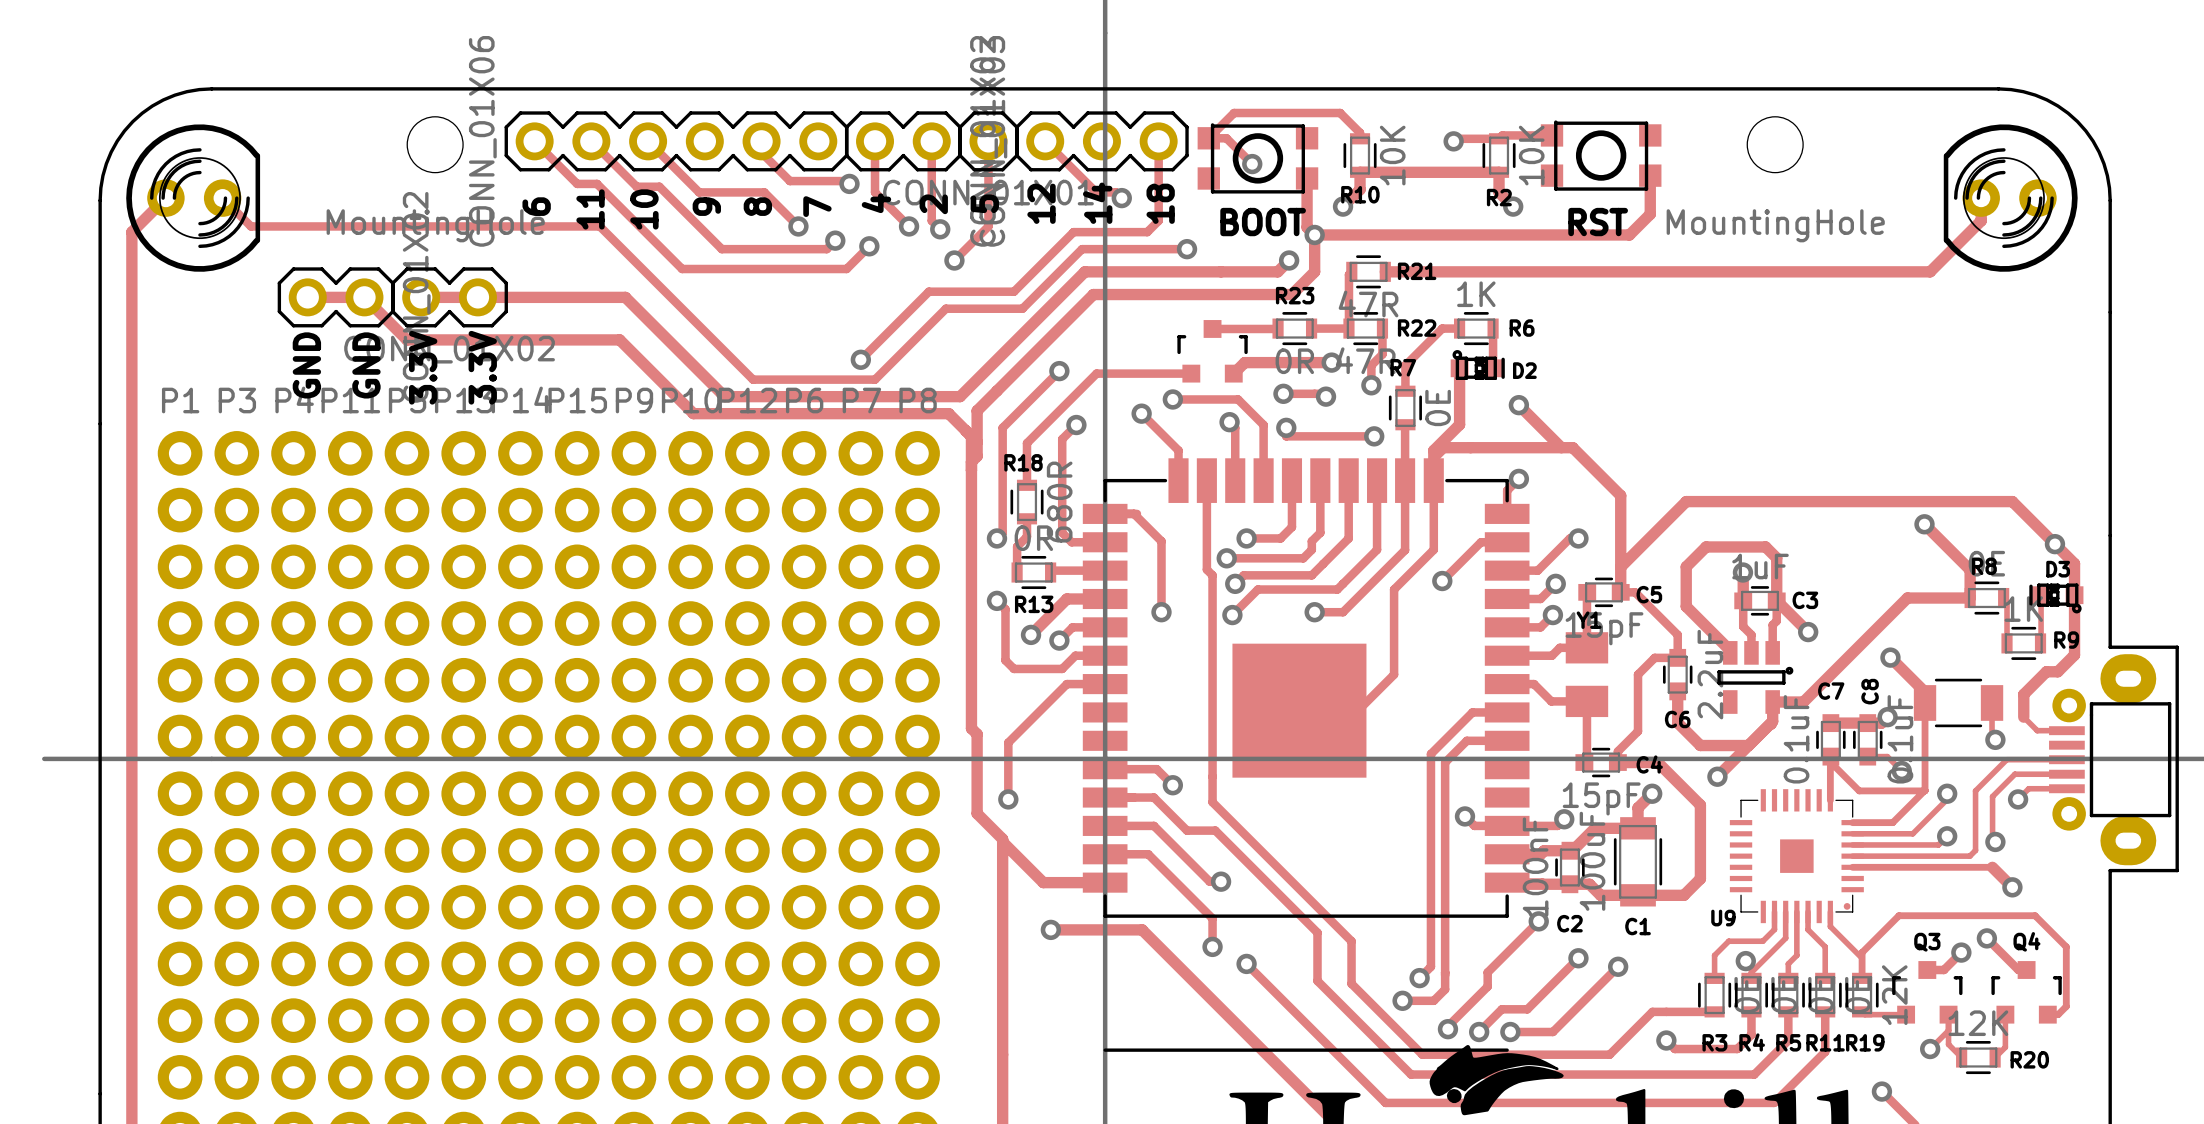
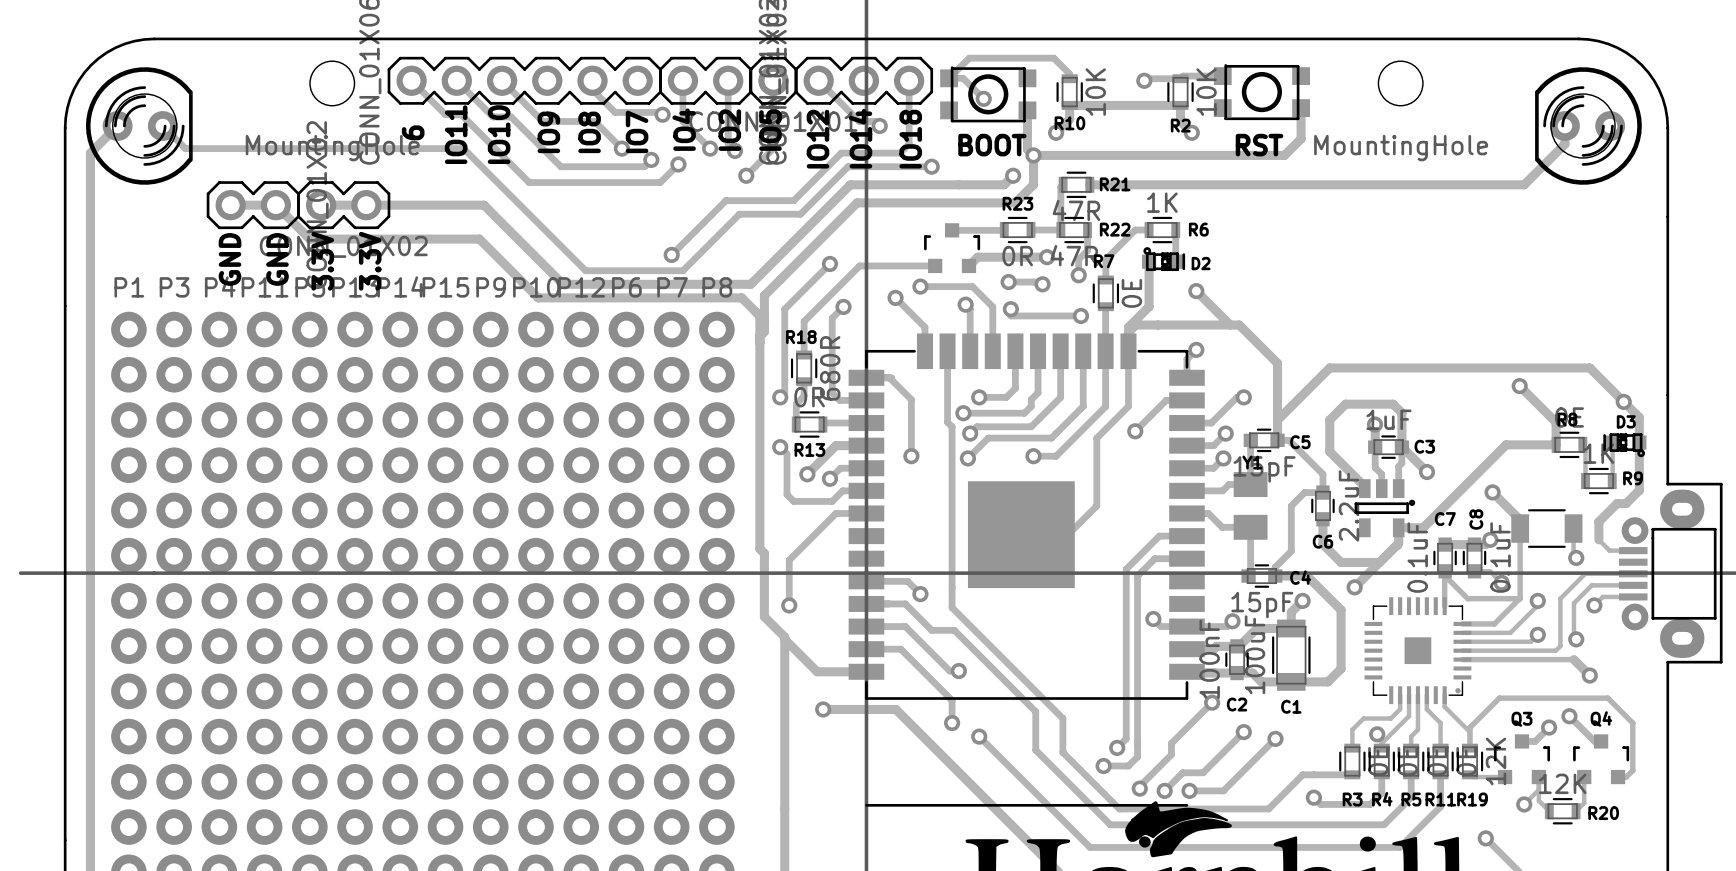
text: 4 (876, 203) -> IO4 (684, 129)
text: 5 (984, 203) -> IO5 (770, 130)
text: 12 (1041, 203) -> IO12 (817, 139)
text: 14 (1097, 203) -> IO14 (860, 138)
text: 18 (1160, 203) -> IO18 (910, 139)
text: 2 (933, 204) -> IO2 (729, 130)
text: 9 (706, 206) -> IO9 (548, 132)
text: 8 (757, 206) -> IO8 (589, 132)
text: 7 (817, 206) -> IO7 (637, 131)
text: 11 (590, 209) -> IO11 (456, 134)
text: 10 (644, 209) -> IO10 (499, 134)
U9 name: U9 (1723, 918) -> none

